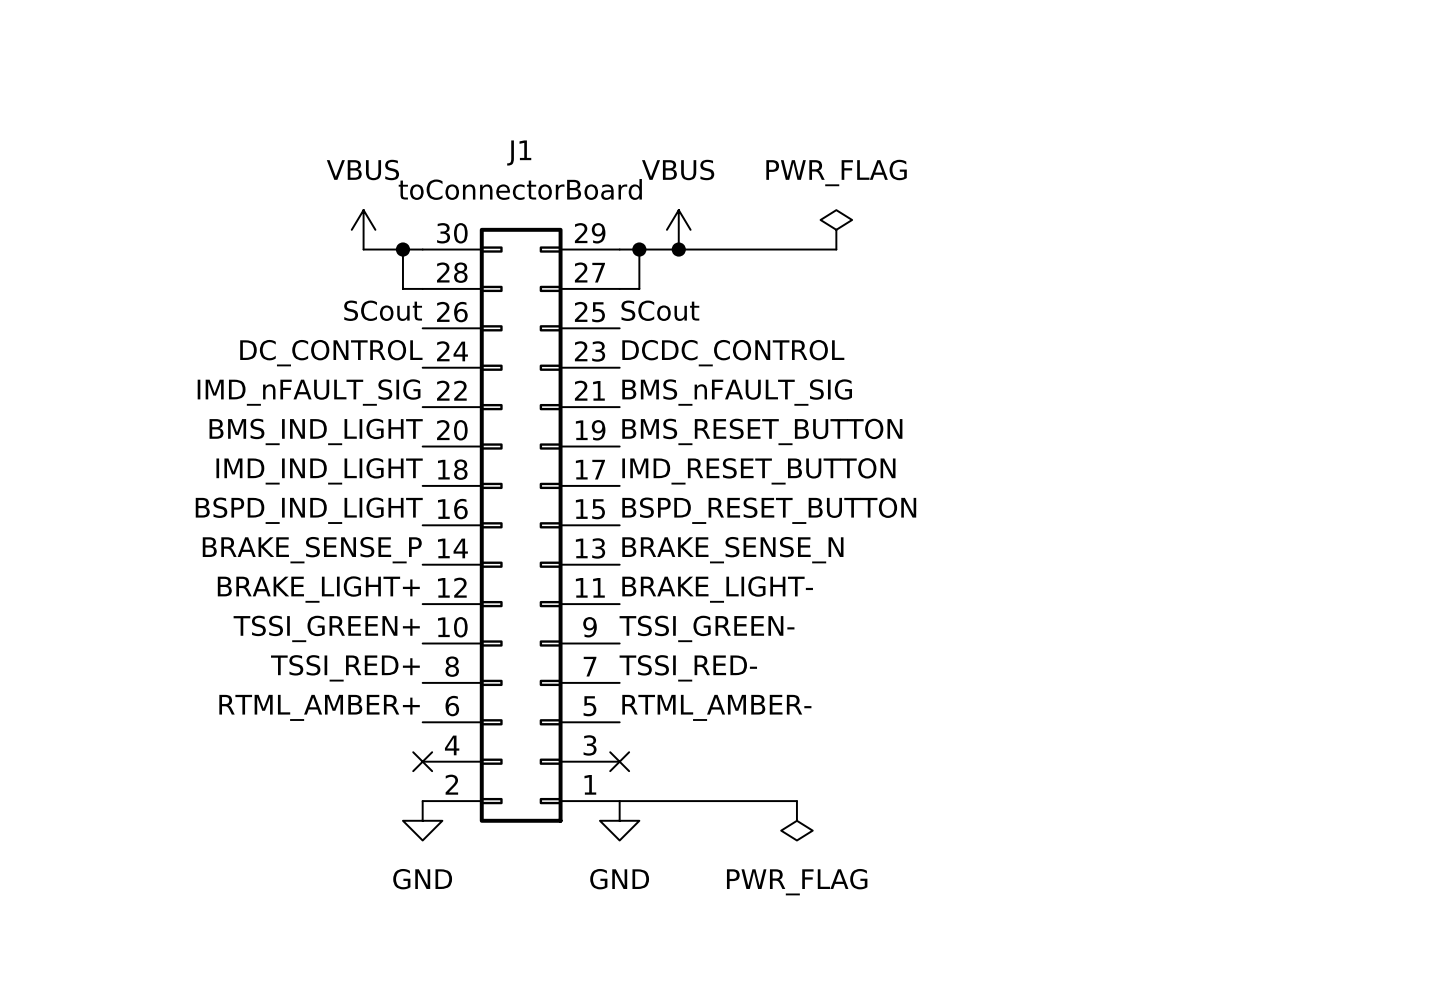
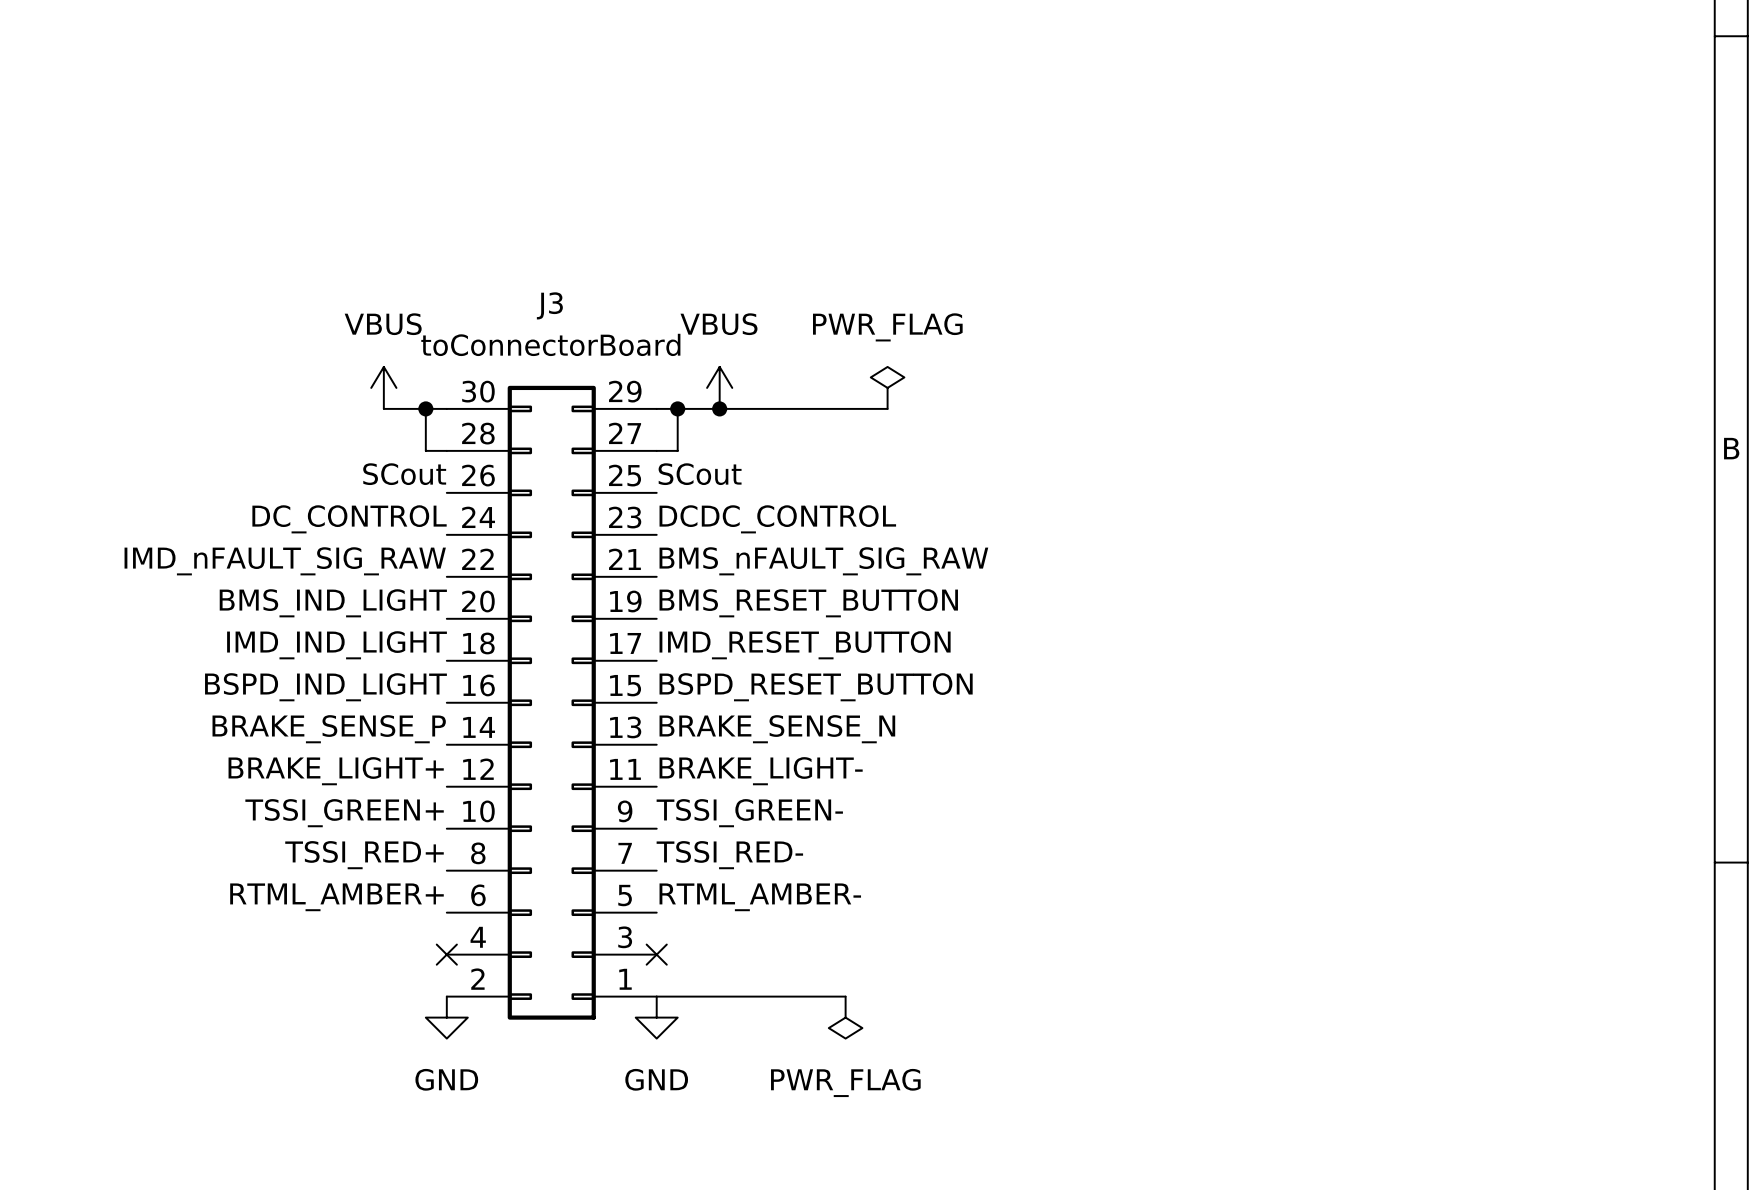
J1 name: J1 (519, 153) -> J3 (549, 305)
label: IMD_nFAULT_SIG (309, 392) -> IMD_nFAULT_SIG_RAW (285, 561)
label: BMS_nFAULT_SIG (737, 392) -> BMS_nFAULT_SIG_RAW (823, 561)

